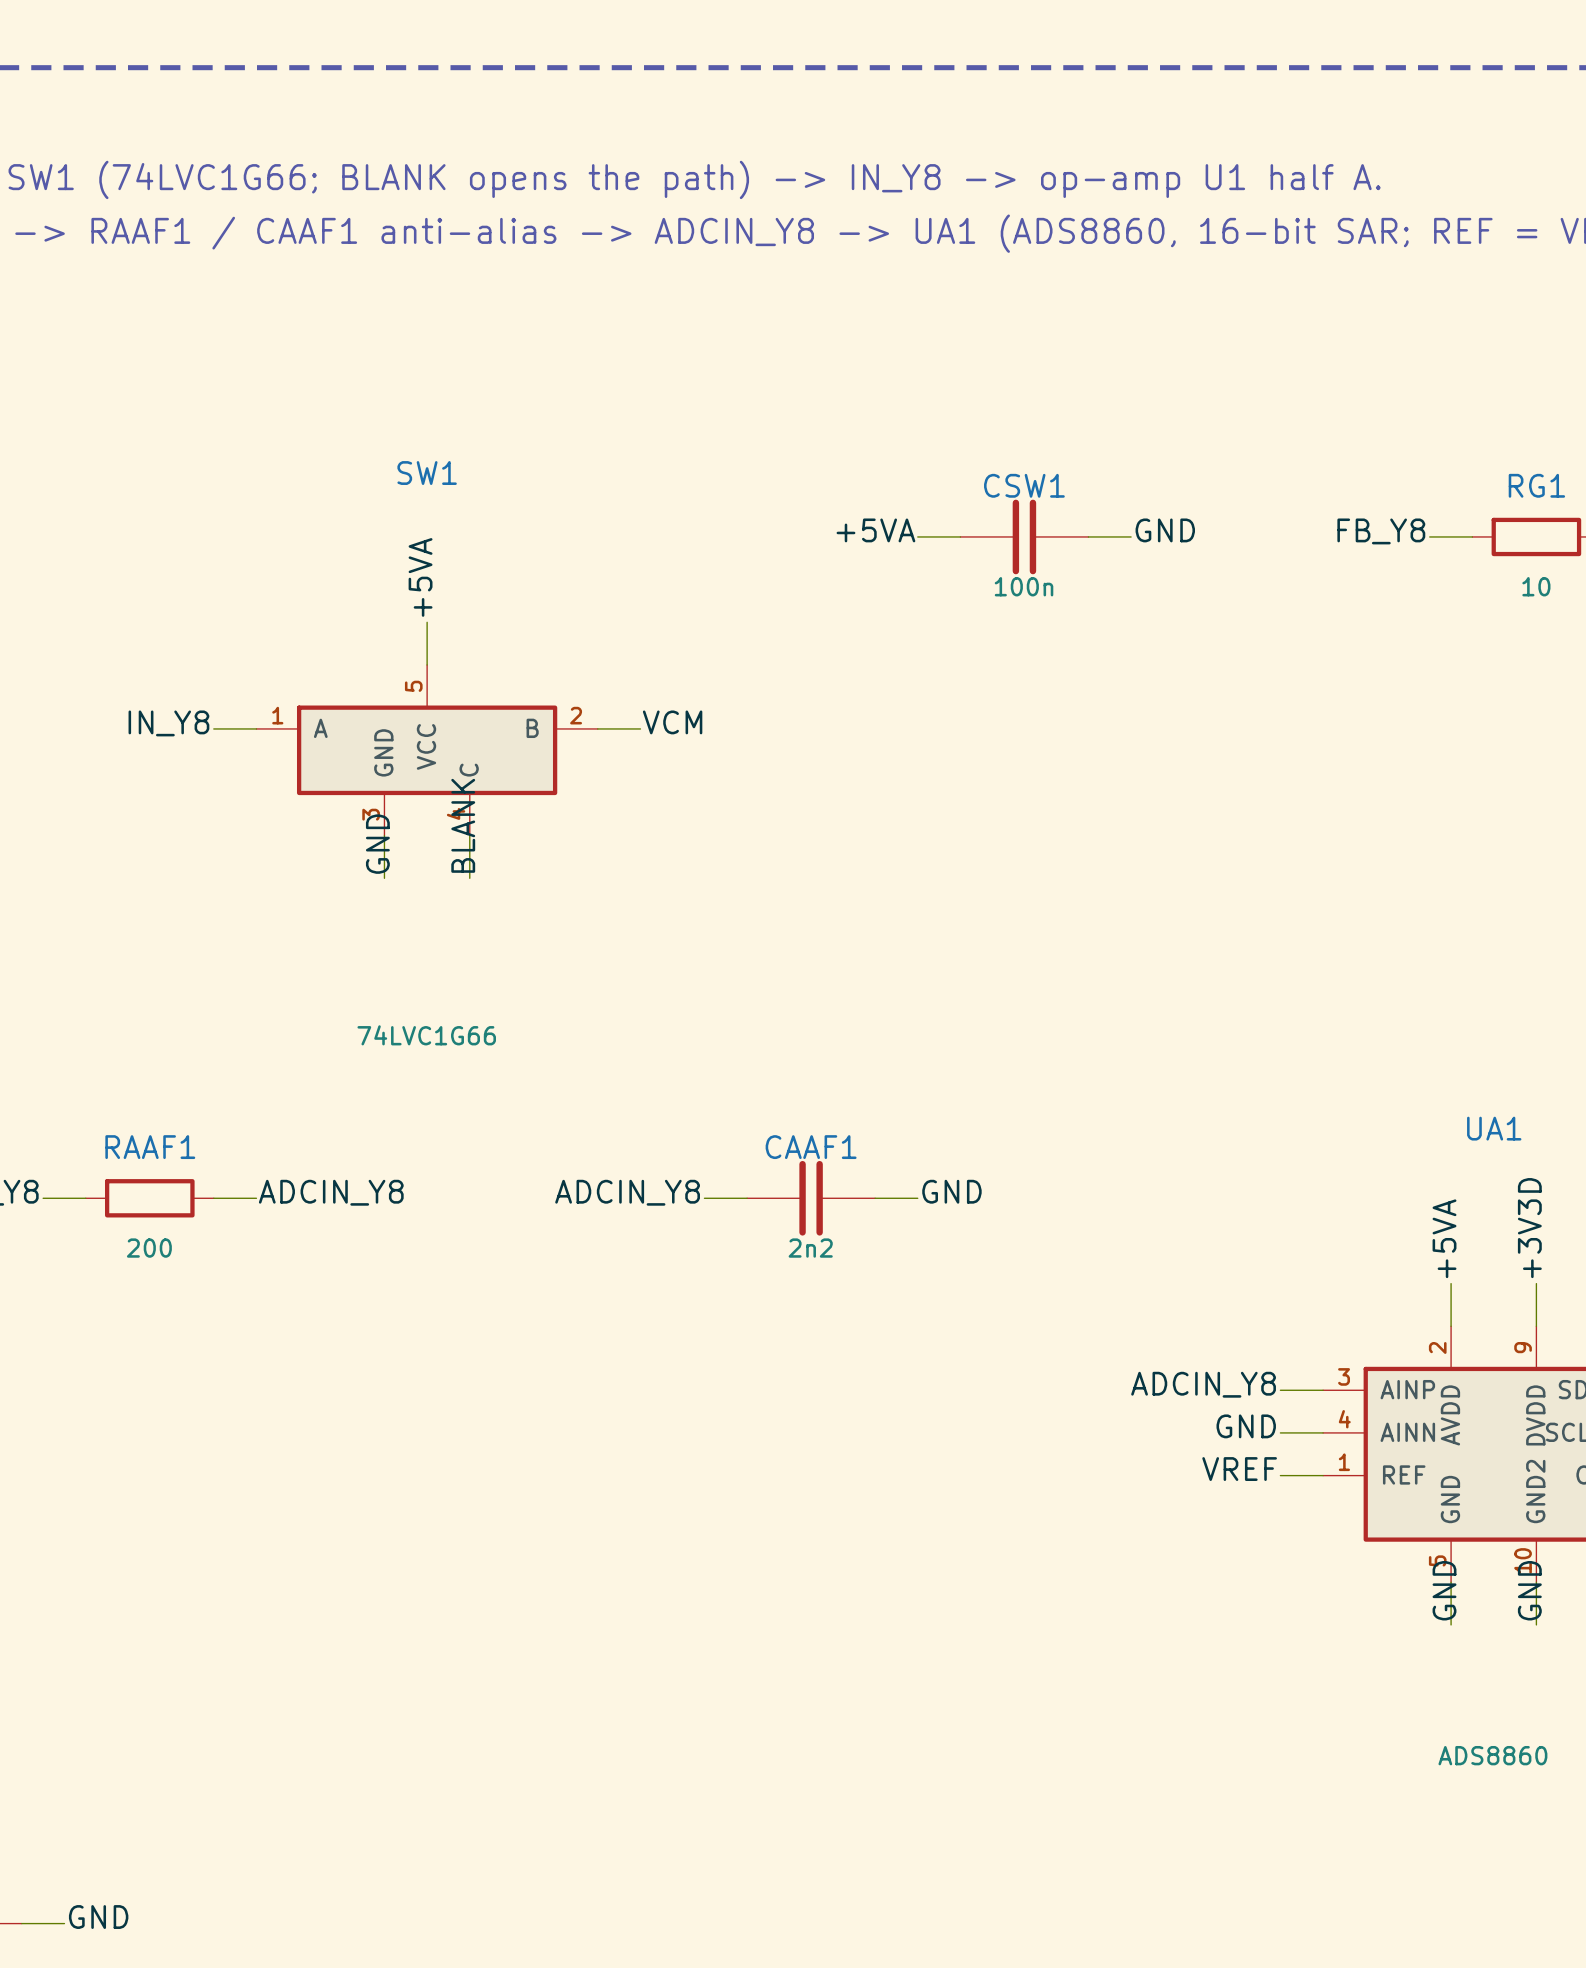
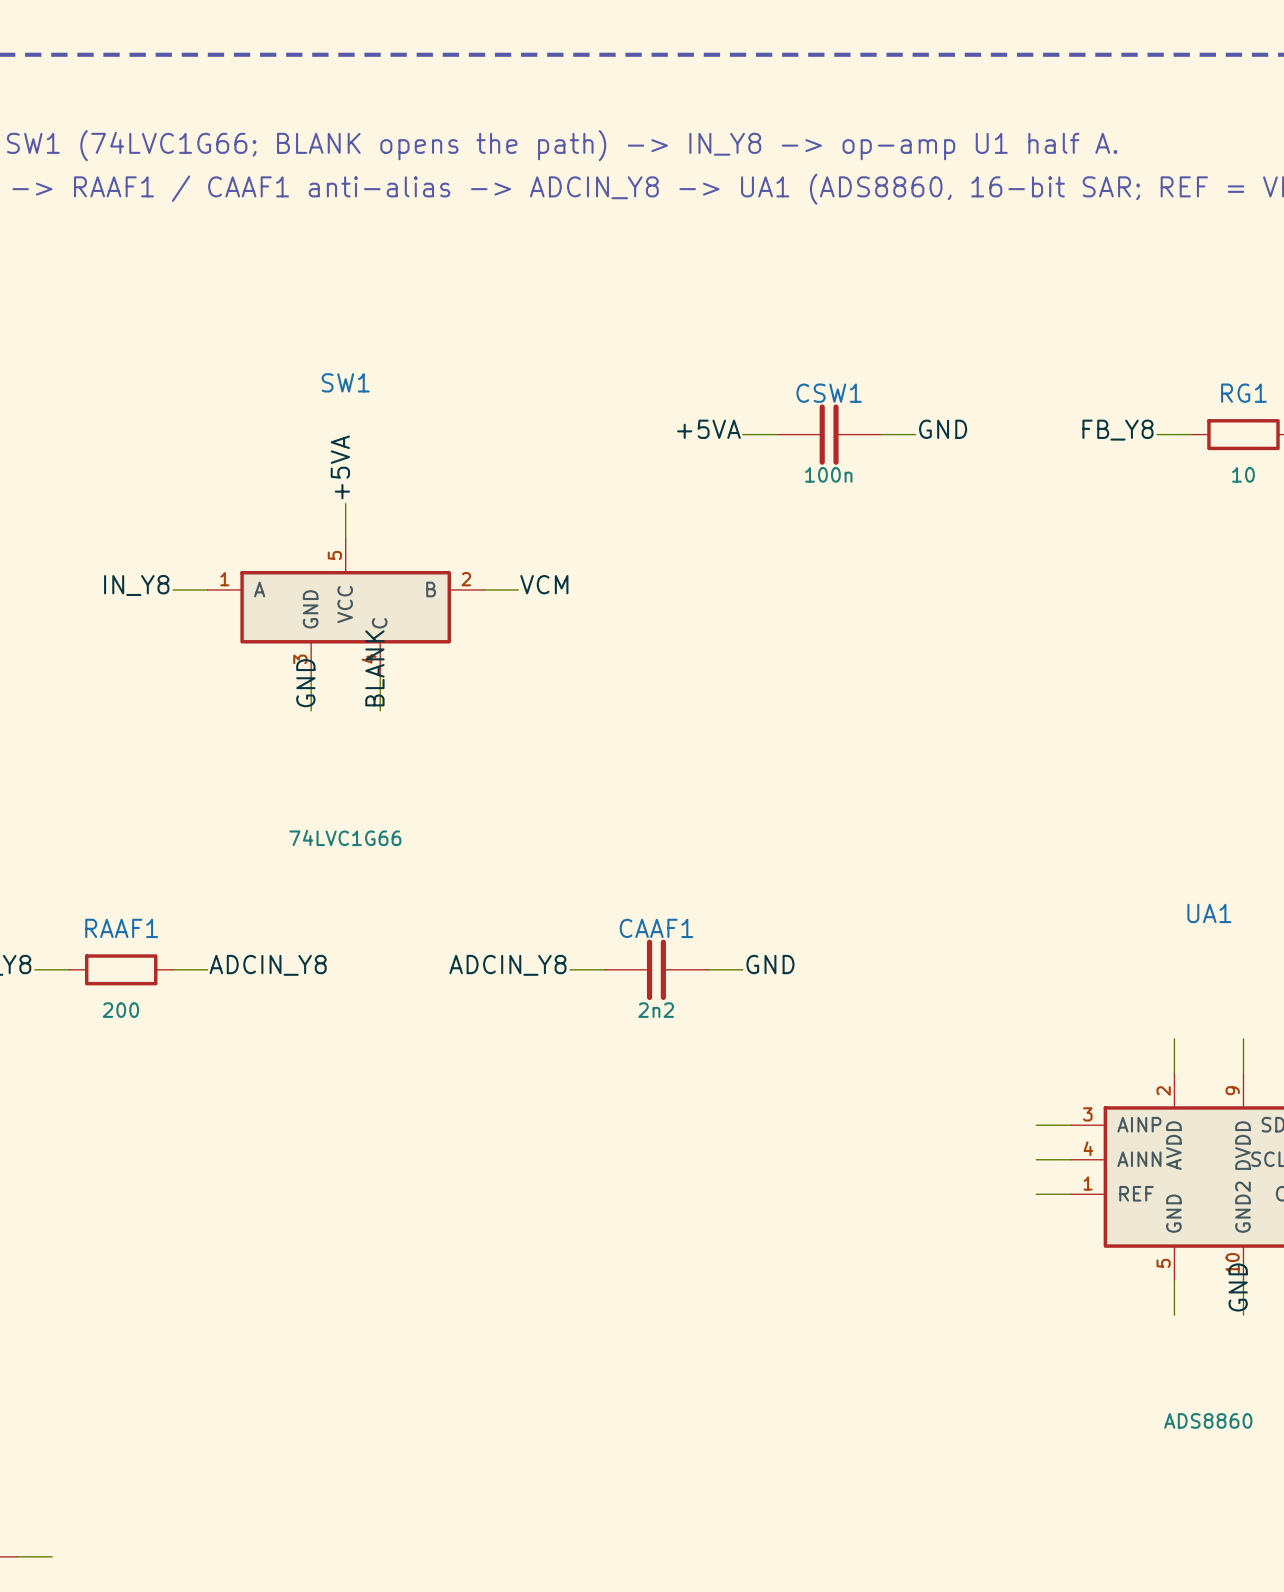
label: +3V3D (1529, 1228) -> none
label: +5VA (1444, 1238) -> none
label: ADCIN_Y8 (1203, 1384) -> none
label: GND (1246, 1426) -> none
label: VREF (1239, 1469) -> none
label: GND (1444, 1590) -> none
label: GND (98, 1917) -> none

